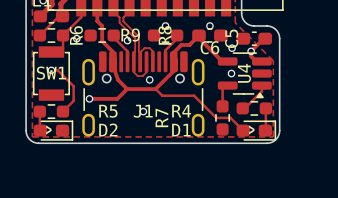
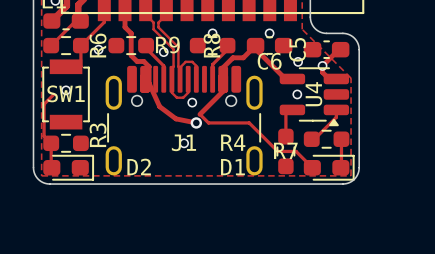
track: (102, 41) (112, 51) (112, 64) (118, 79) (127, 89) -> (131, 52) (131, 55) (137, 61) (143, 61) (149, 66) (149, 83) (159, 106) (175, 118) (196, 122)
track: (51, 70) (57, 70) (73, 86) (73, 100) (63, 111) -> none
track: none -> (53, 94) (44, 104) (44, 136) (51, 143)
track: (127, 89) (155, 89) -> none
track: (127, 89) (117, 98) (89, 98) -> none
via: none -> (196, 122)
via: (89, 98) -> none
R5 name: R5 (108, 111) -> R3 (98, 135)
R7 name rotation: 0° (161, 117) -> 90° clockwise (285, 150)
R7 name position: R7 (161, 117) -> R7 (285, 150)
text: > (48, 129) -> none
text: > (251, 129) -> none

